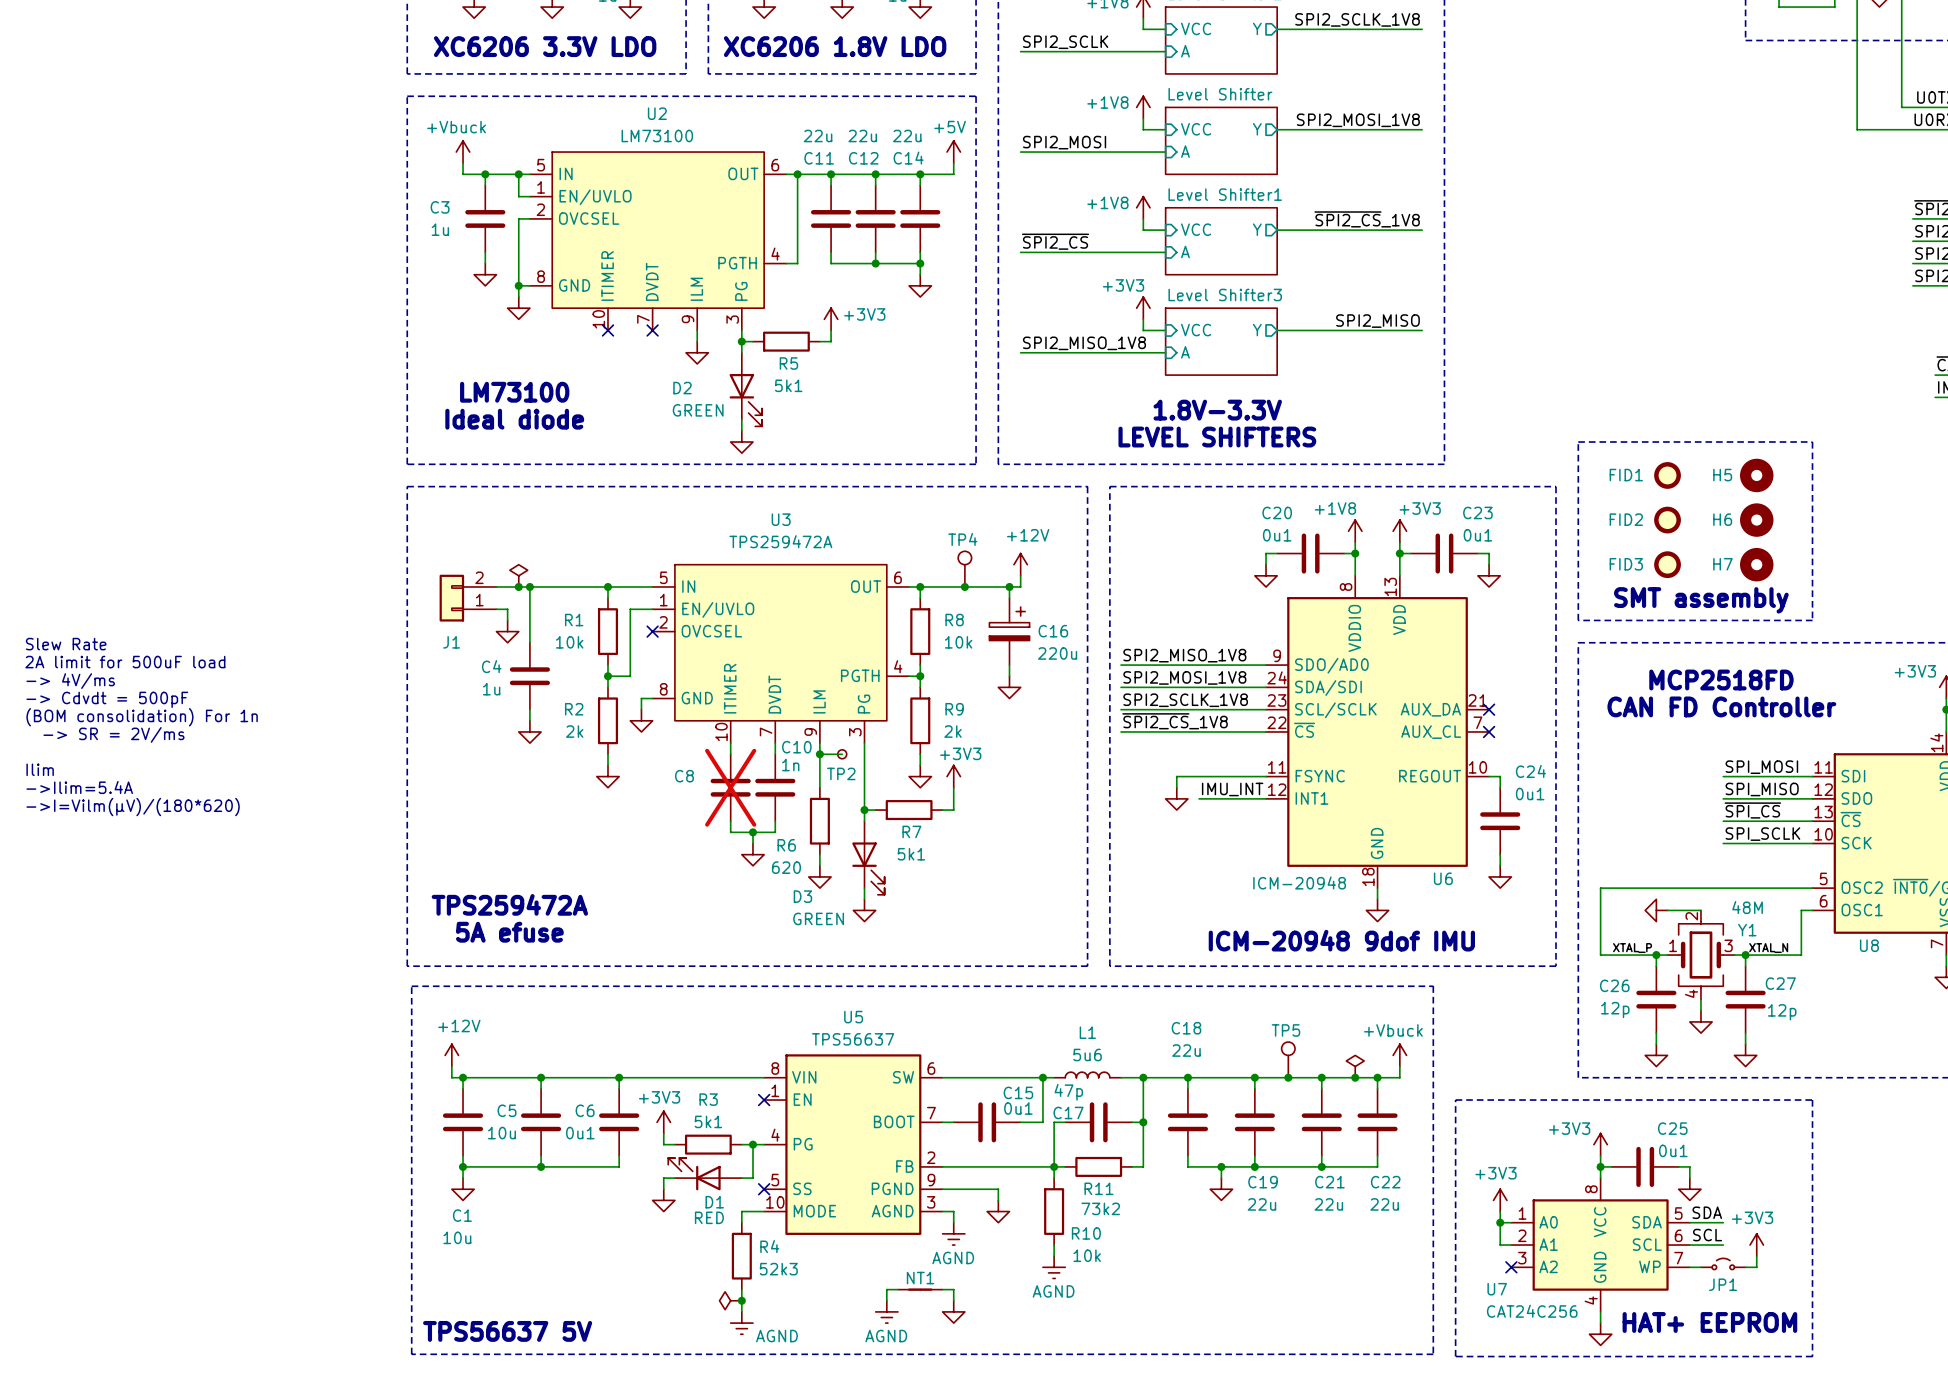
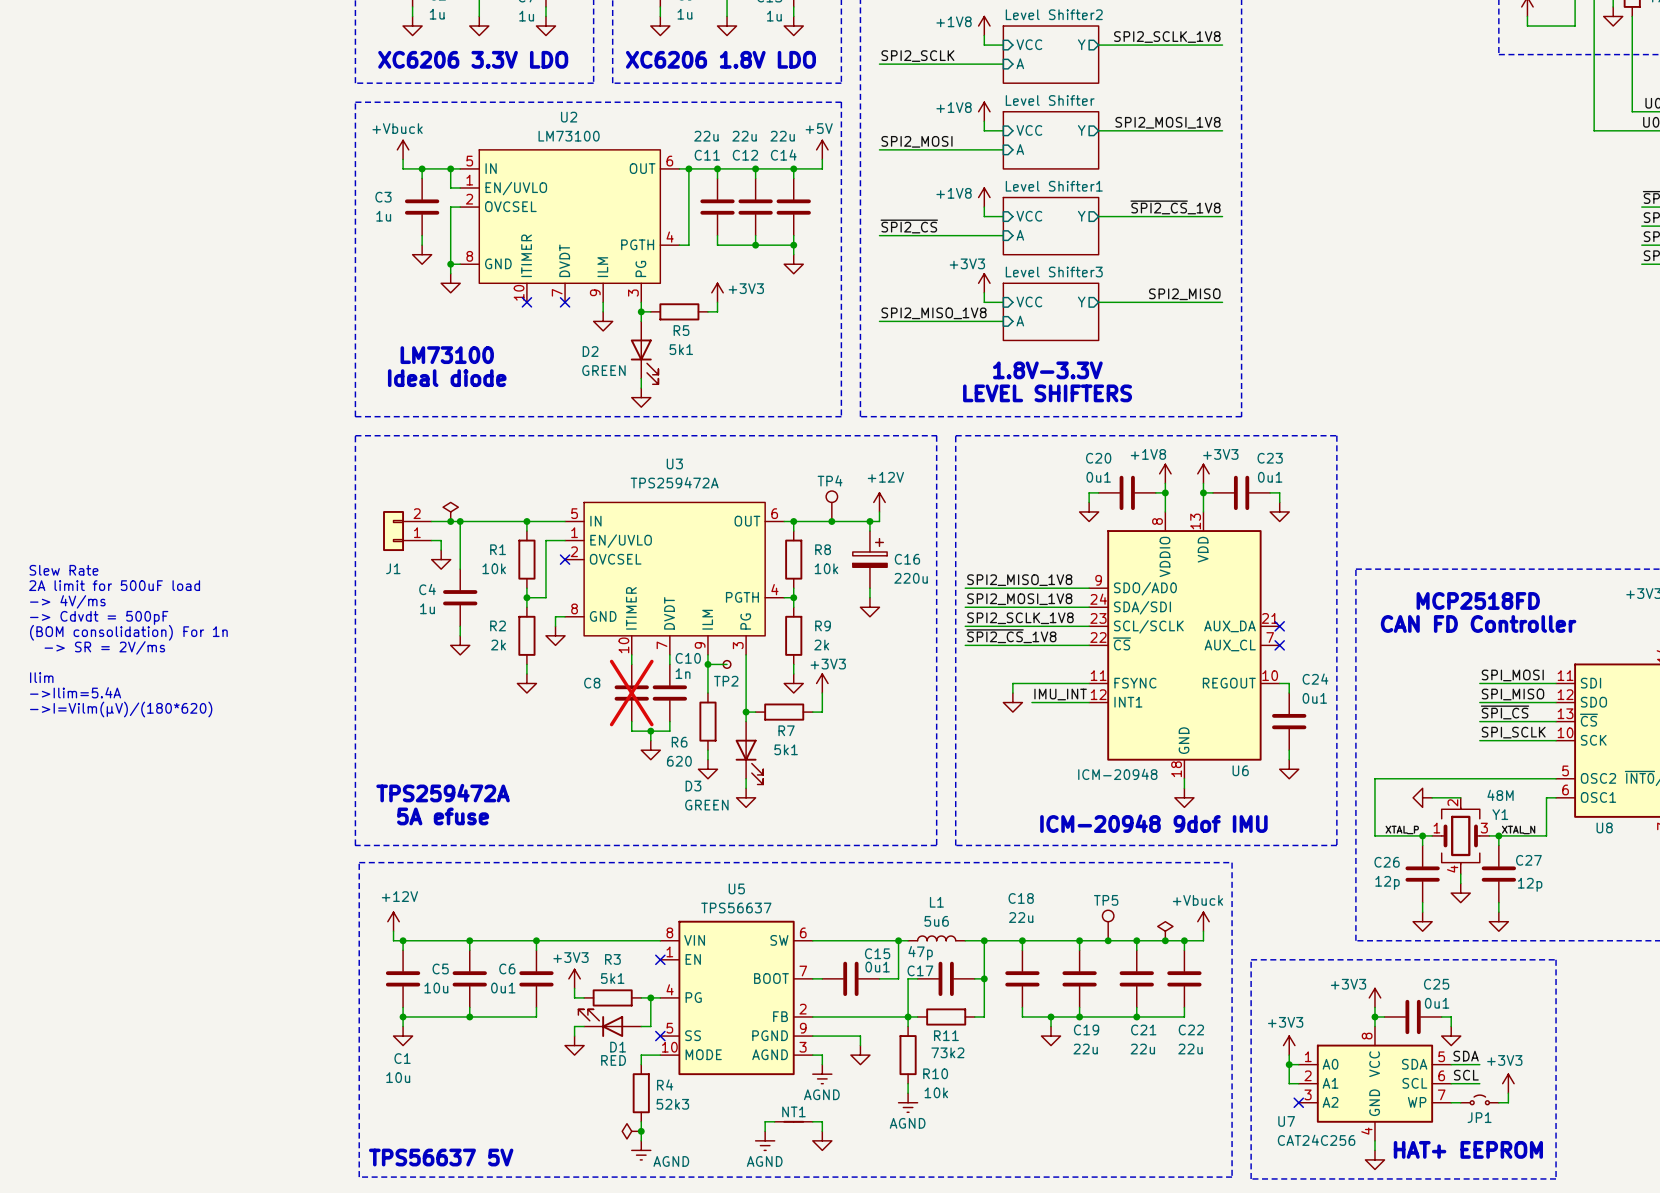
line: (1578, 442) (1812, 442) (1812, 620) (1578, 620) (1578, 442) -> none
FID1: (1667, 475) -> none
H5: (1756, 475) -> none
FID2: (1667, 520) -> none
H6: (1756, 520) -> none
FID3: (1667, 564) -> none
H7: (1756, 564) -> none
text: SMT assembly (1701, 600) -> none

